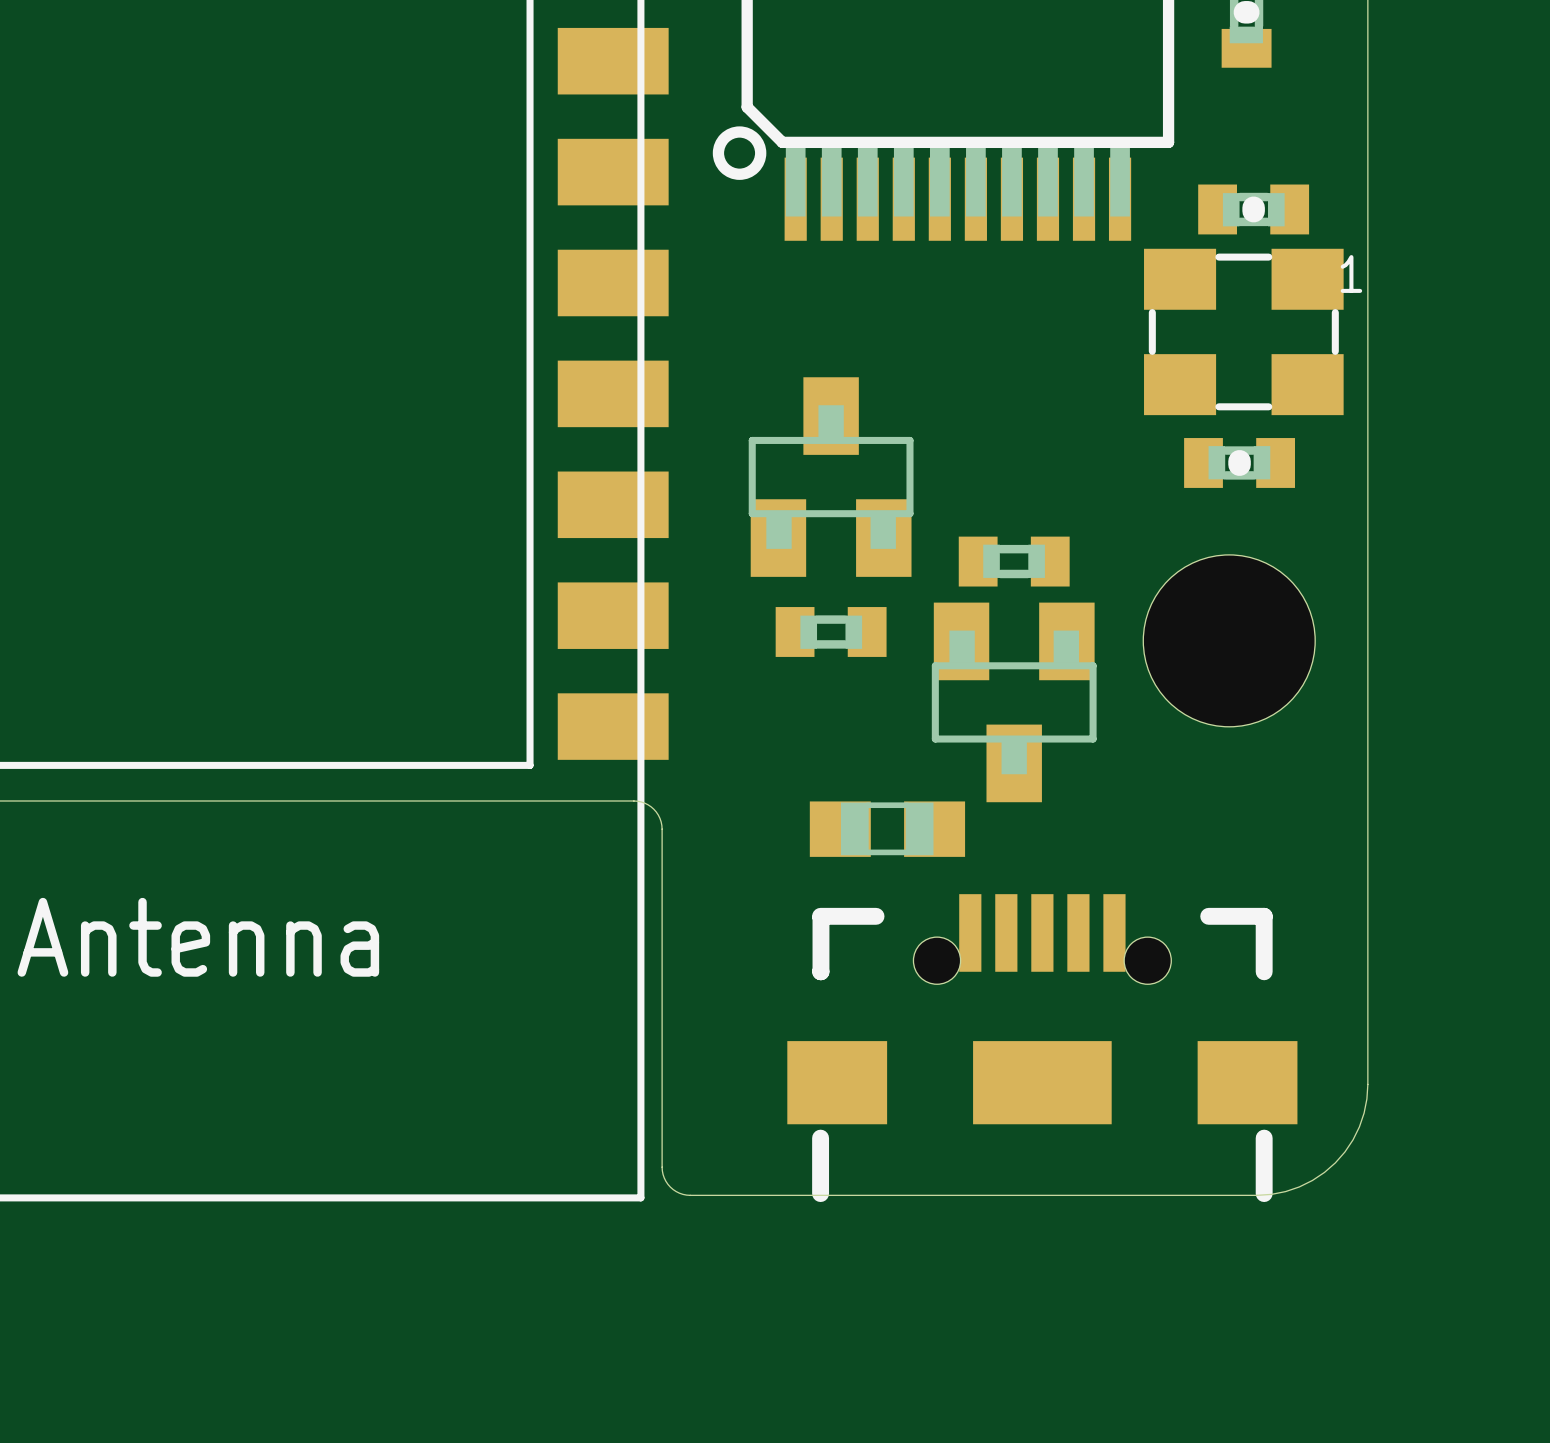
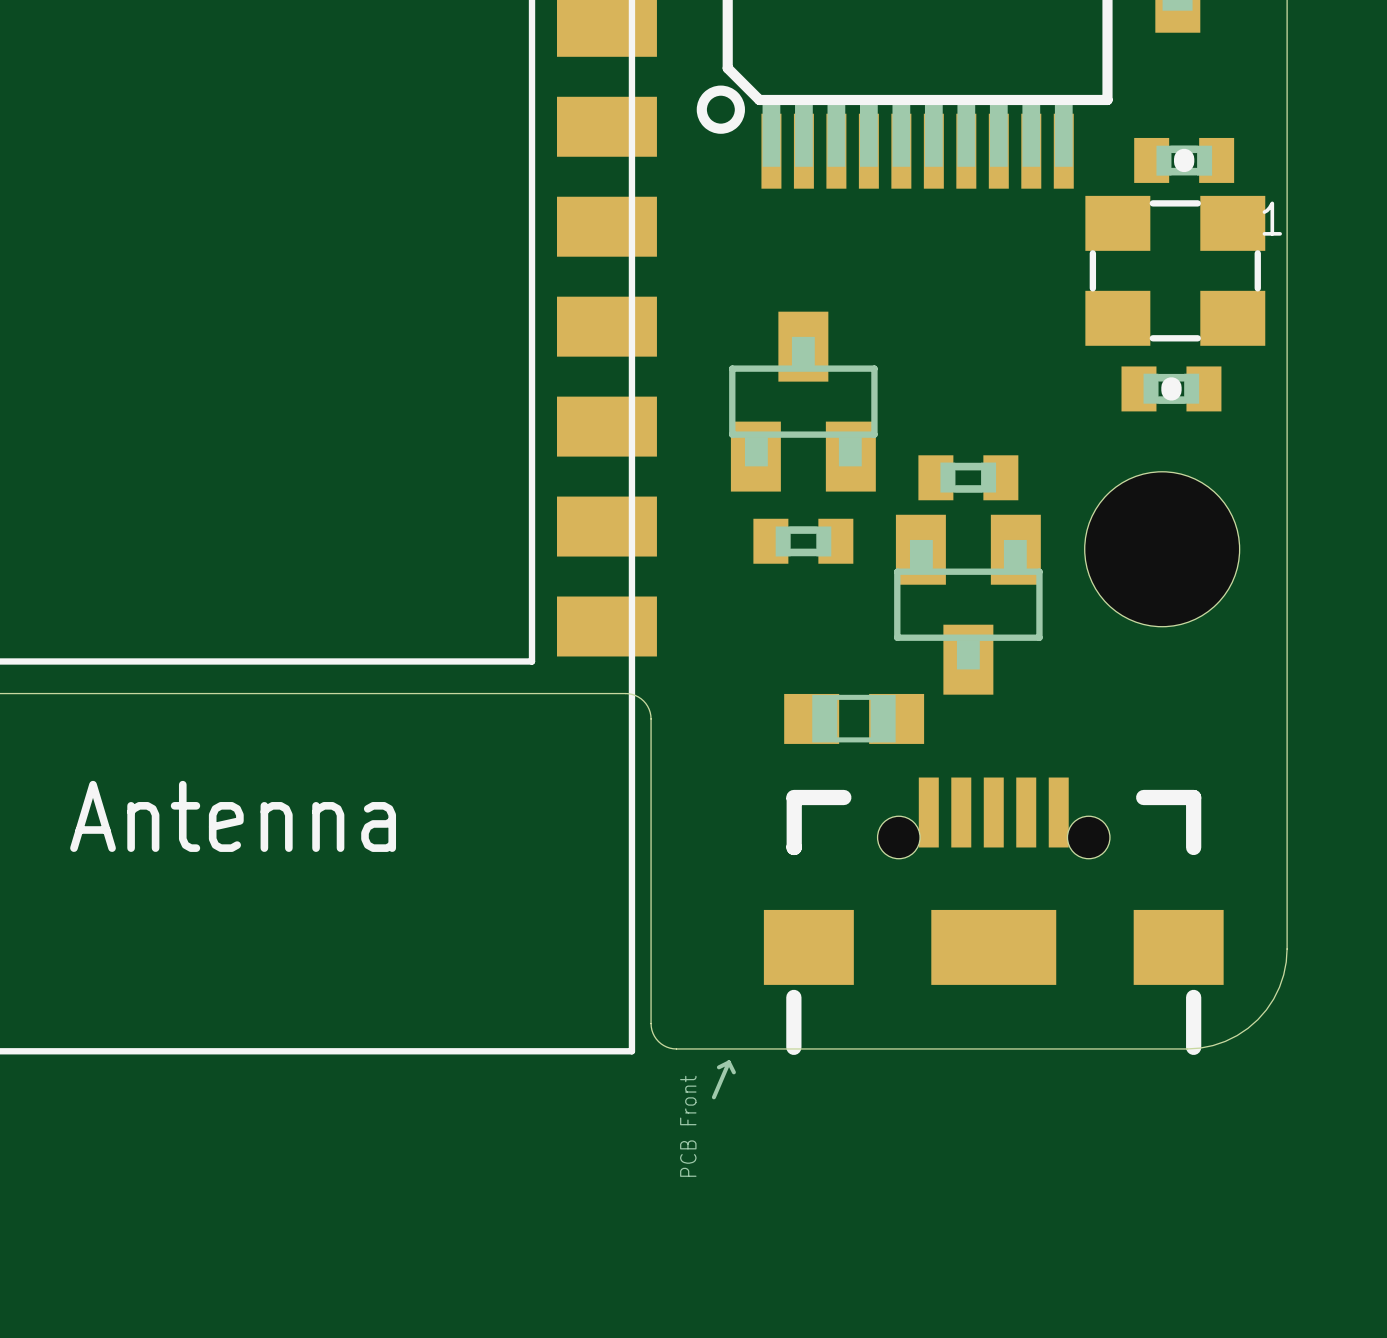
part footprint: [787, 894, 1298, 1203] -> [711, 777, 1224, 1100]

